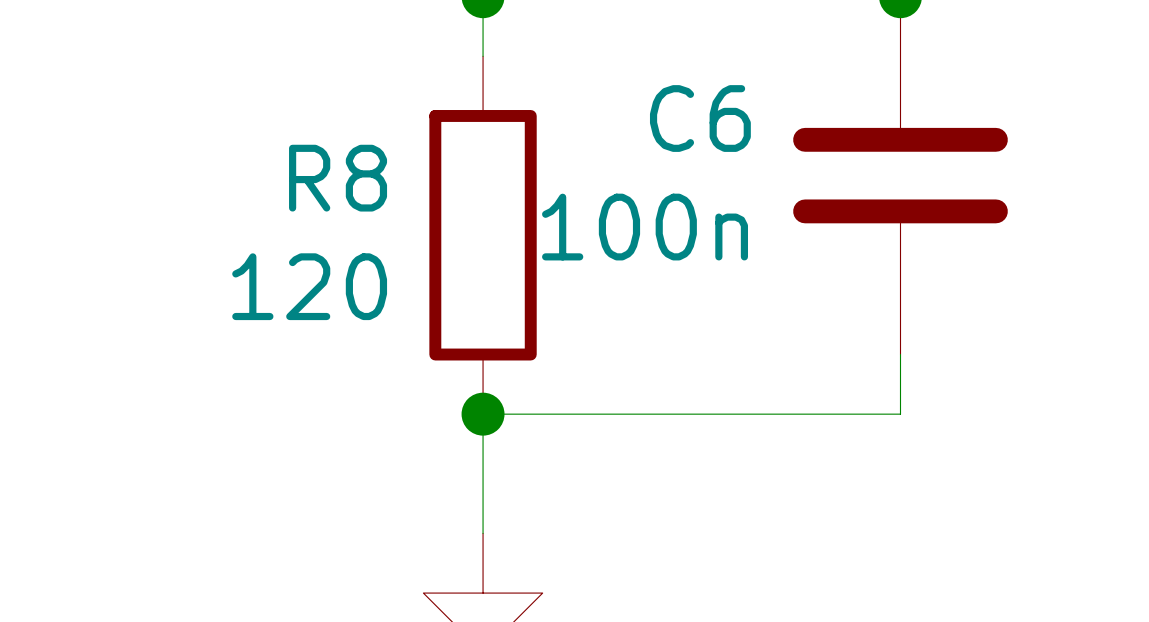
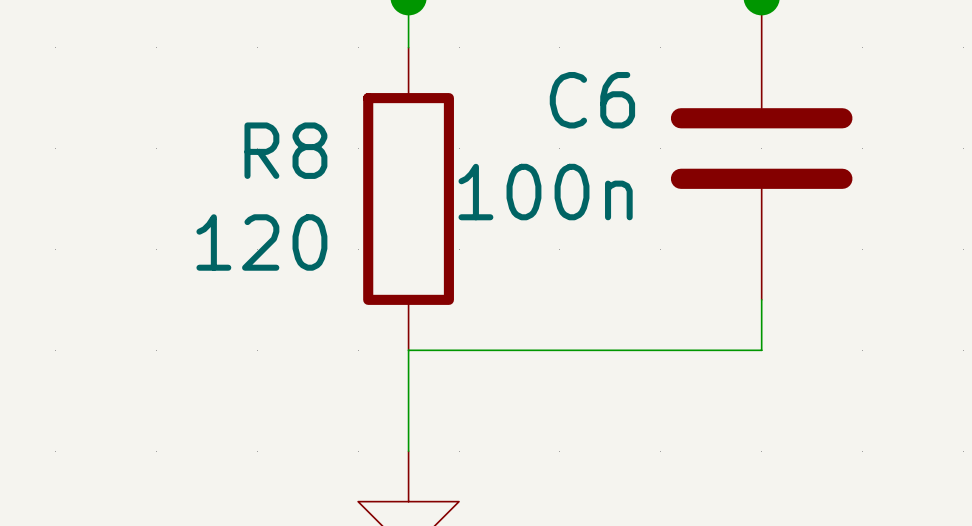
junction: (483, 414) -> none

